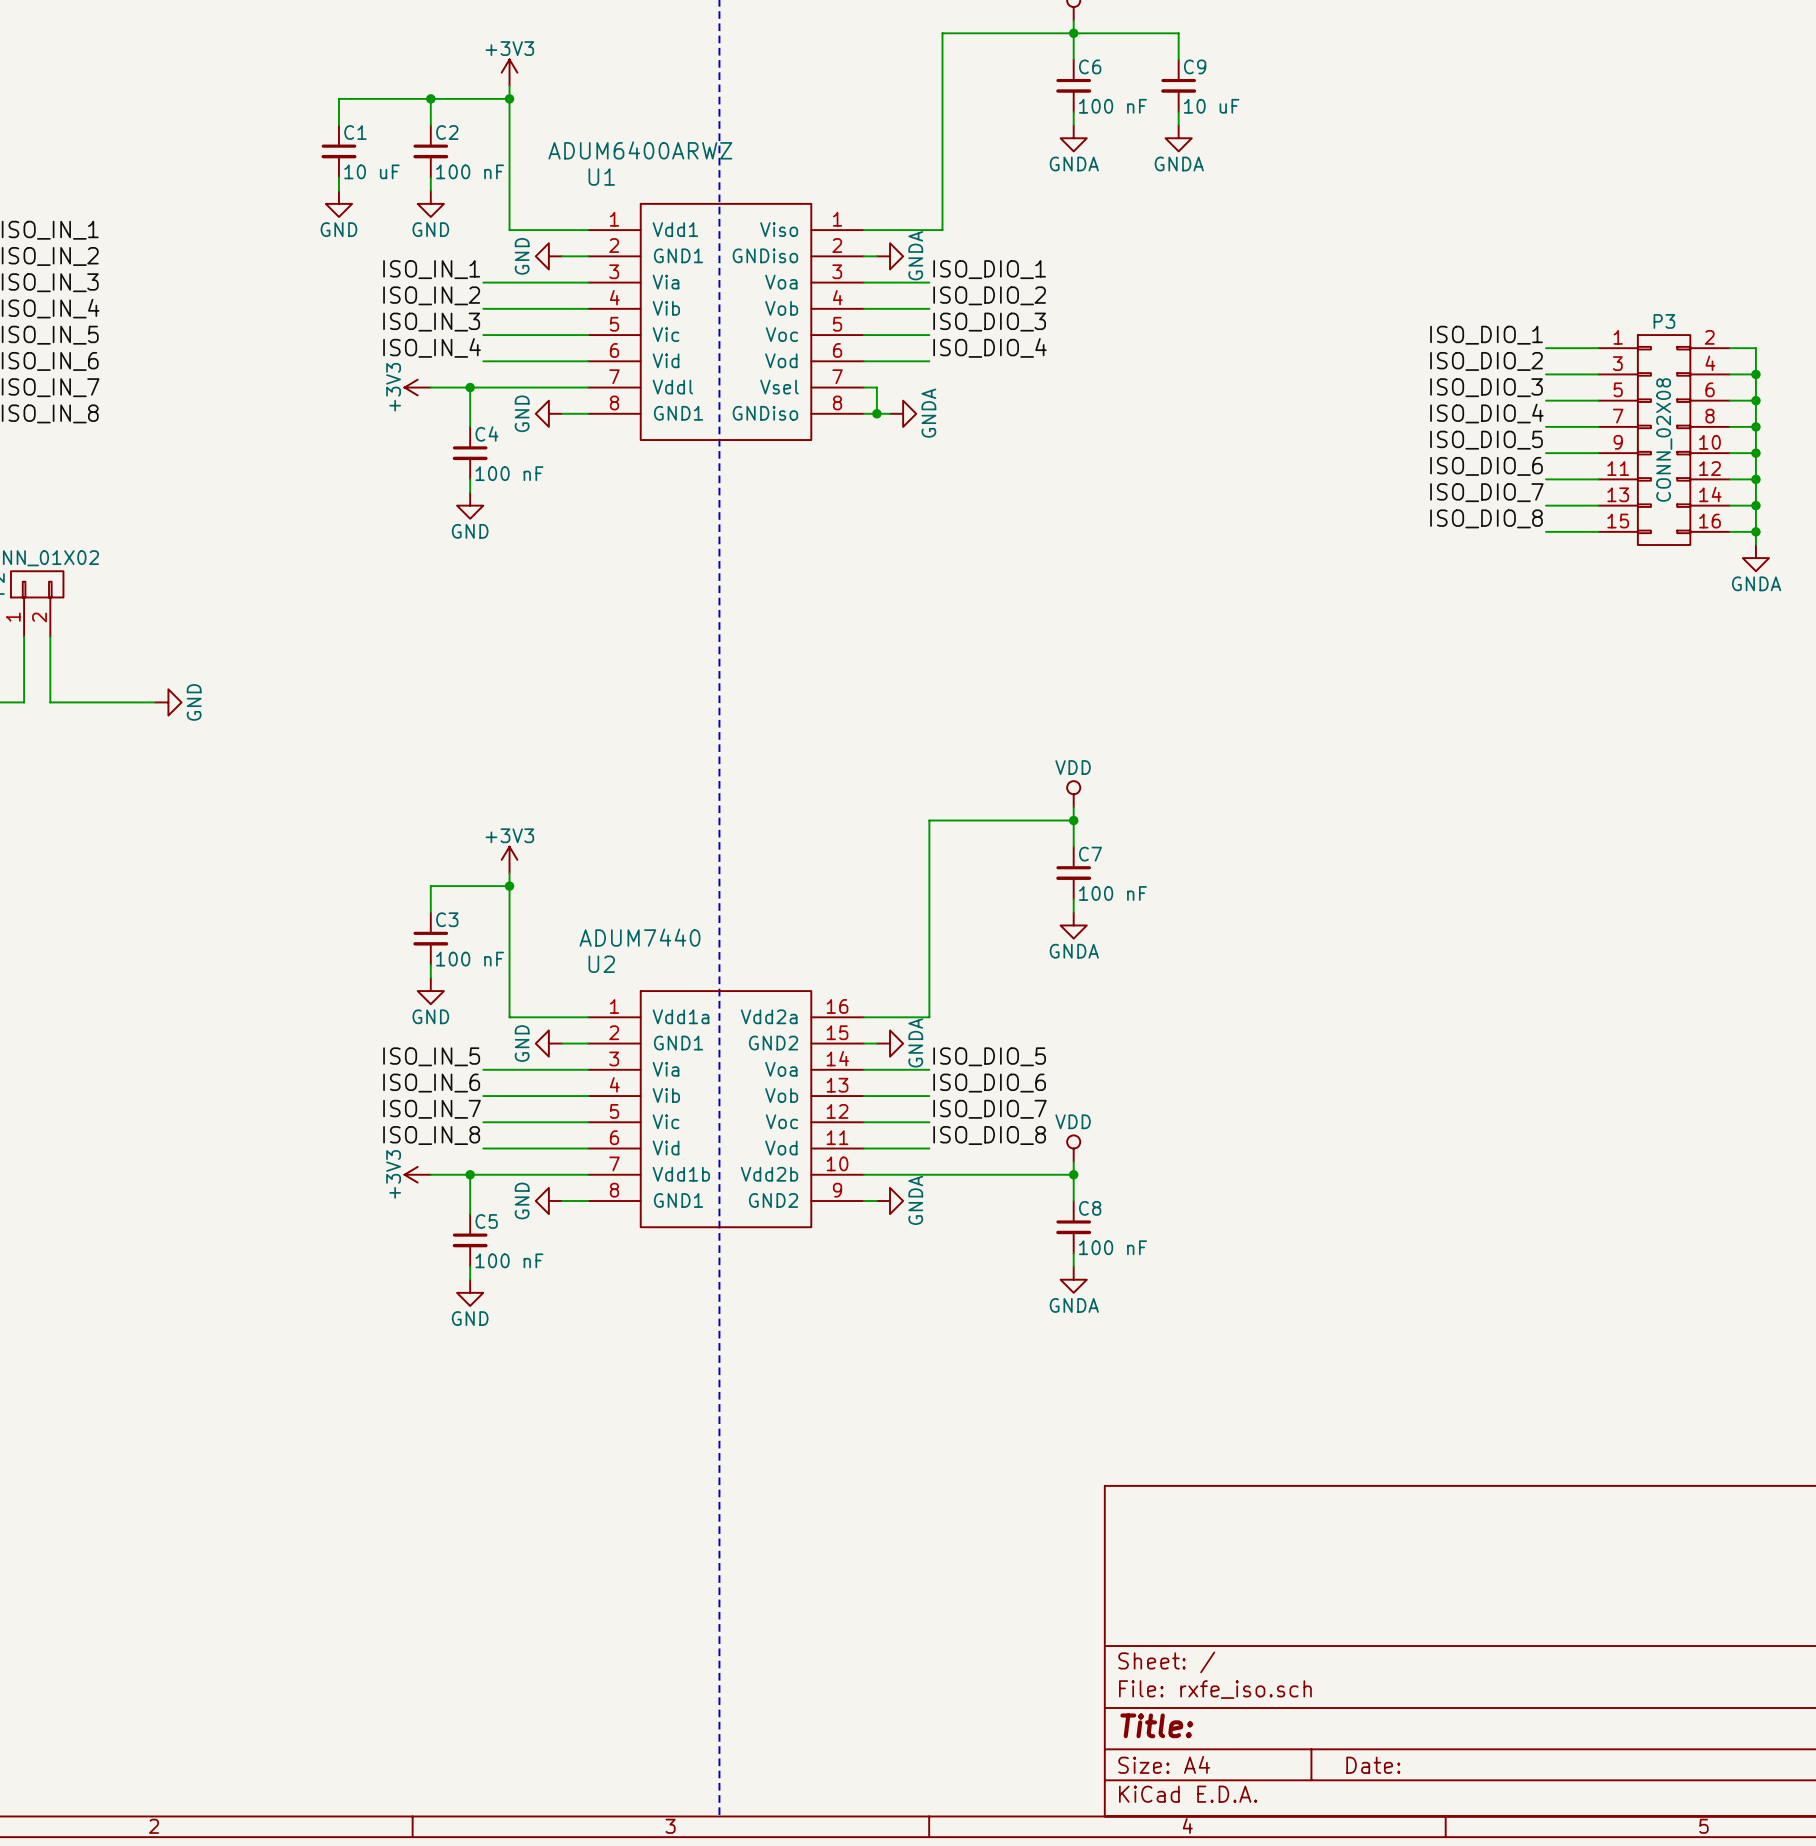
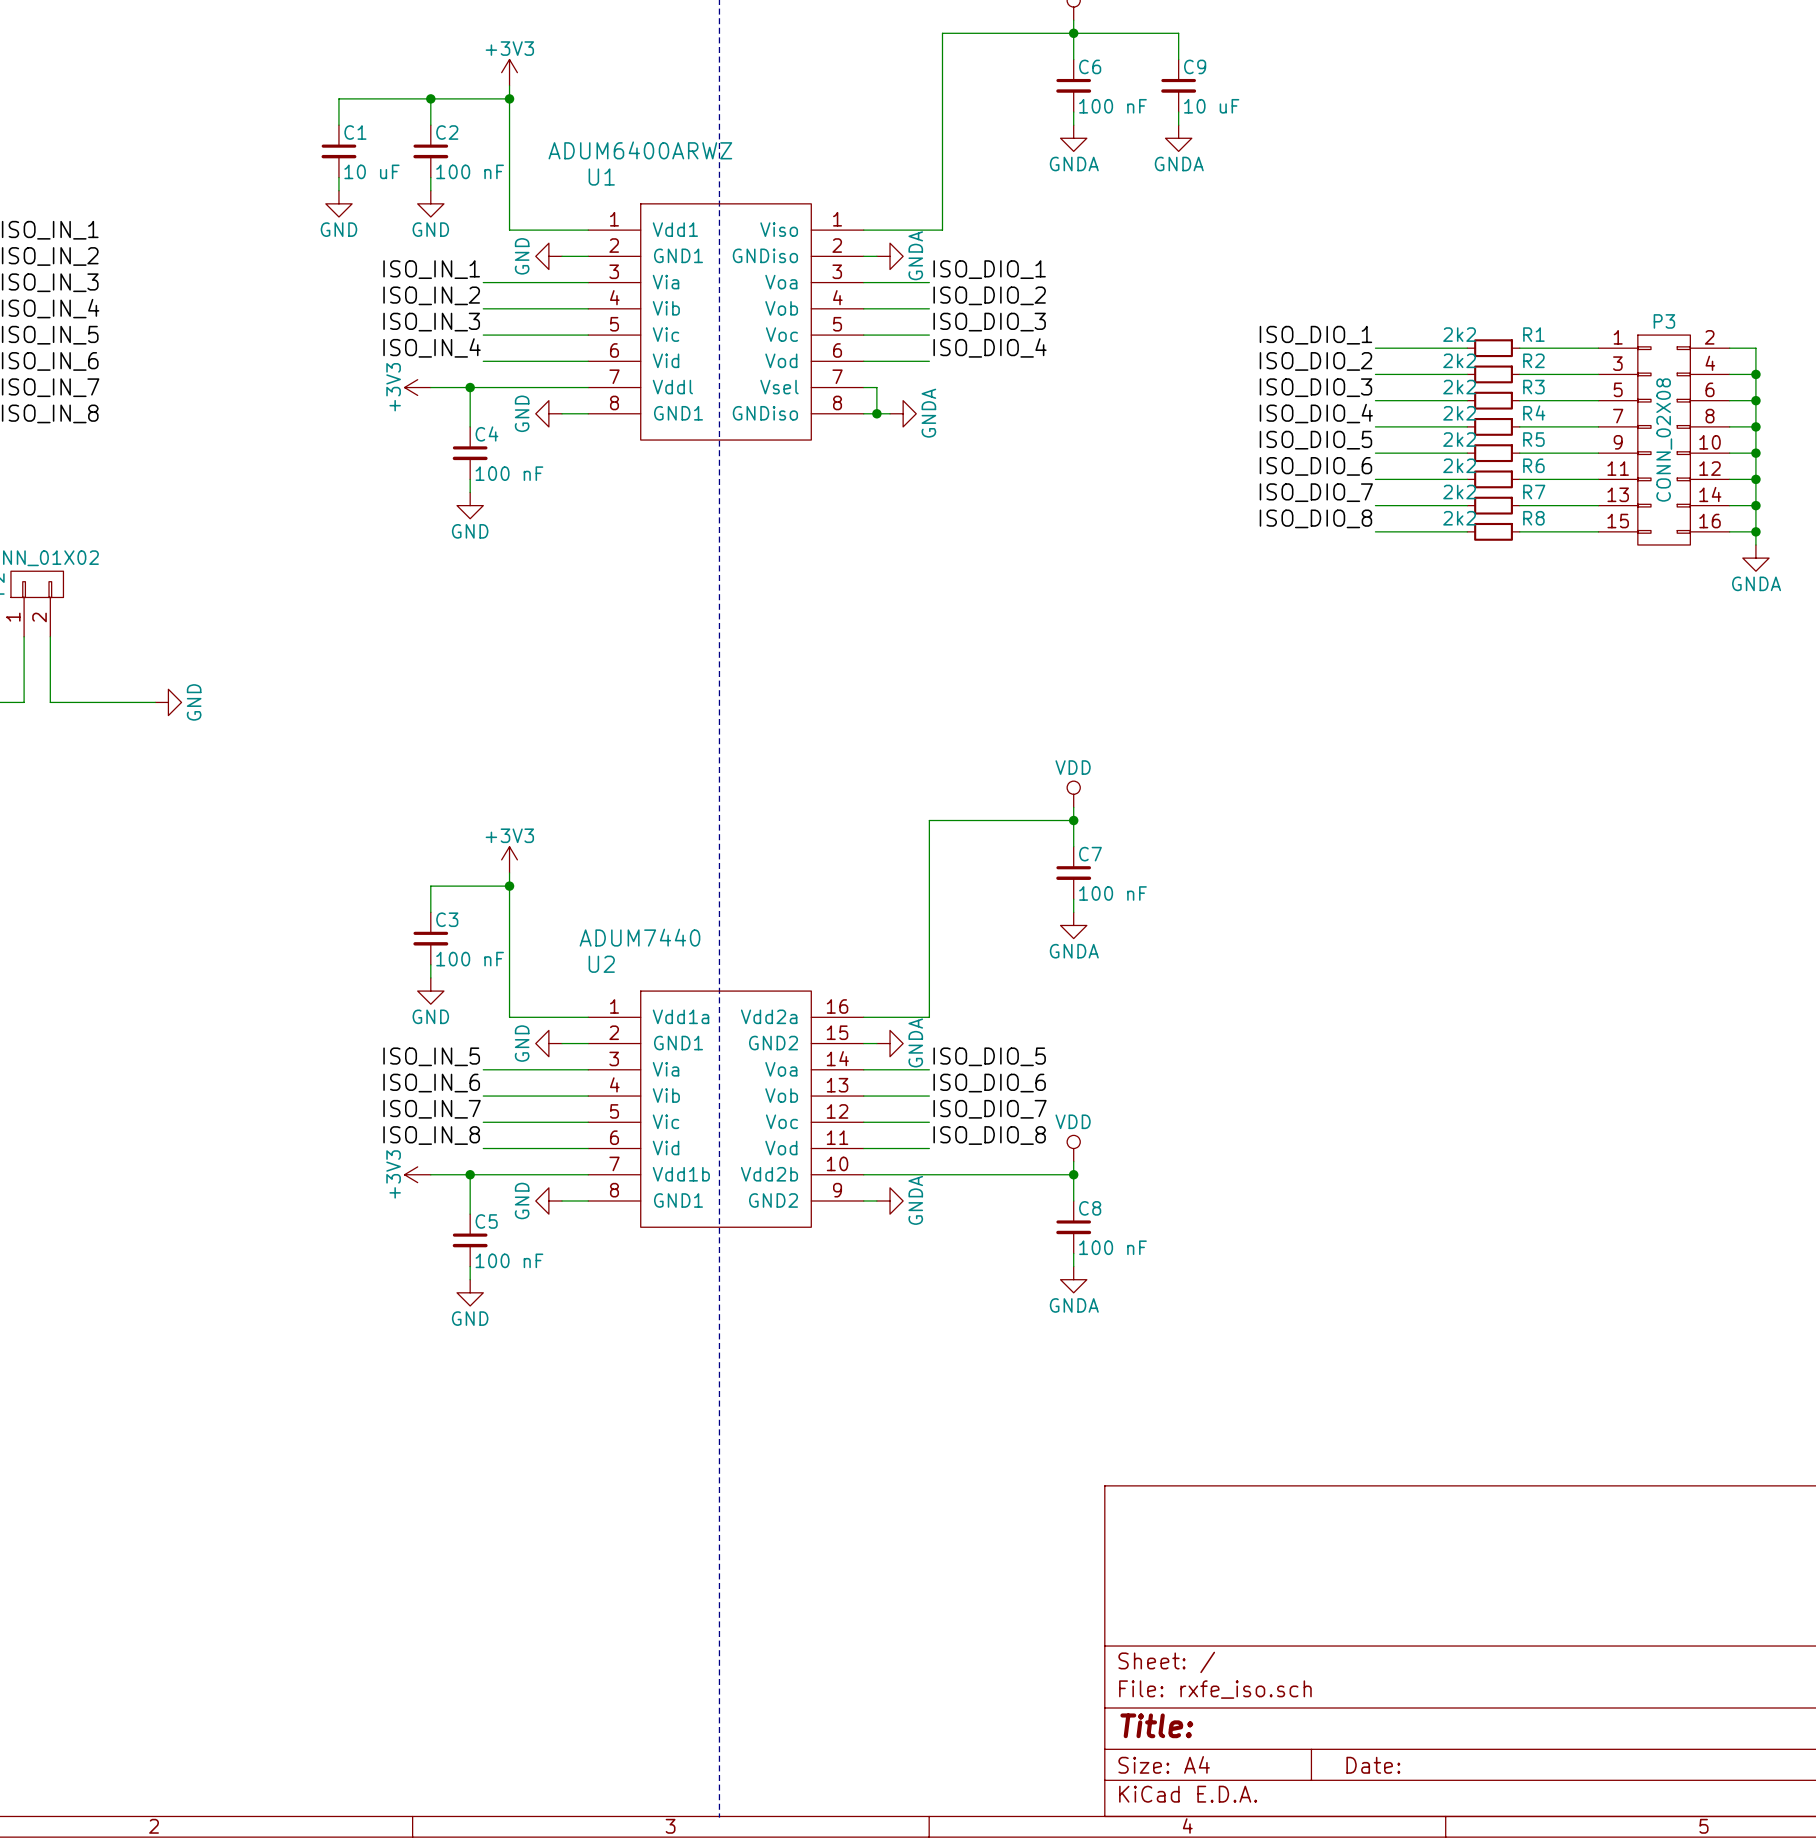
label position: ISO_DIO_1 (1486, 335) -> ISO_DIO_1 (1315, 335)
wire: none -> (1375, 348) (1467, 348)
R1: none -> 2k2 (1493, 348)
wire: none -> (1519, 348) (1546, 348)
label position: ISO_DIO_2 (1486, 361) -> ISO_DIO_2 (1315, 361)
wire: none -> (1375, 374) (1467, 374)
R2: none -> 2k2 (1493, 374)
wire: none -> (1519, 374) (1546, 374)
label position: ISO_DIO_3 (1486, 387) -> ISO_DIO_3 (1315, 387)
wire: none -> (1375, 400) (1467, 400)
R3: none -> 2k2 (1493, 400)
wire: none -> (1519, 400) (1546, 400)
label position: ISO_DIO_4 (1486, 413) -> ISO_DIO_4 (1316, 413)
wire: none -> (1375, 426) (1467, 426)
R4: none -> 2k2 (1493, 426)
wire: none -> (1519, 426) (1546, 426)
label position: ISO_DIO_5 (1486, 440) -> ISO_DIO_5 (1315, 440)
wire: none -> (1375, 453) (1467, 453)
R5: none -> 2k2 (1493, 453)
wire: none -> (1519, 453) (1546, 453)
label position: ISO_DIO_6 (1486, 466) -> ISO_DIO_6 (1315, 466)
wire: none -> (1375, 479) (1467, 479)
R6: none -> 2k2 (1493, 479)
wire: none -> (1519, 479) (1546, 479)
label position: ISO_DIO_7 (1486, 492) -> ISO_DIO_7 (1316, 492)
wire: none -> (1375, 505) (1467, 505)
R7: none -> 2k2 (1493, 505)
wire: none -> (1519, 505) (1546, 505)
label position: ISO_DIO_8 (1486, 518) -> ISO_DIO_8 (1315, 518)
wire: none -> (1375, 531) (1467, 531)
R8: none -> 2k2 (1493, 531)
wire: none -> (1519, 531) (1546, 531)

